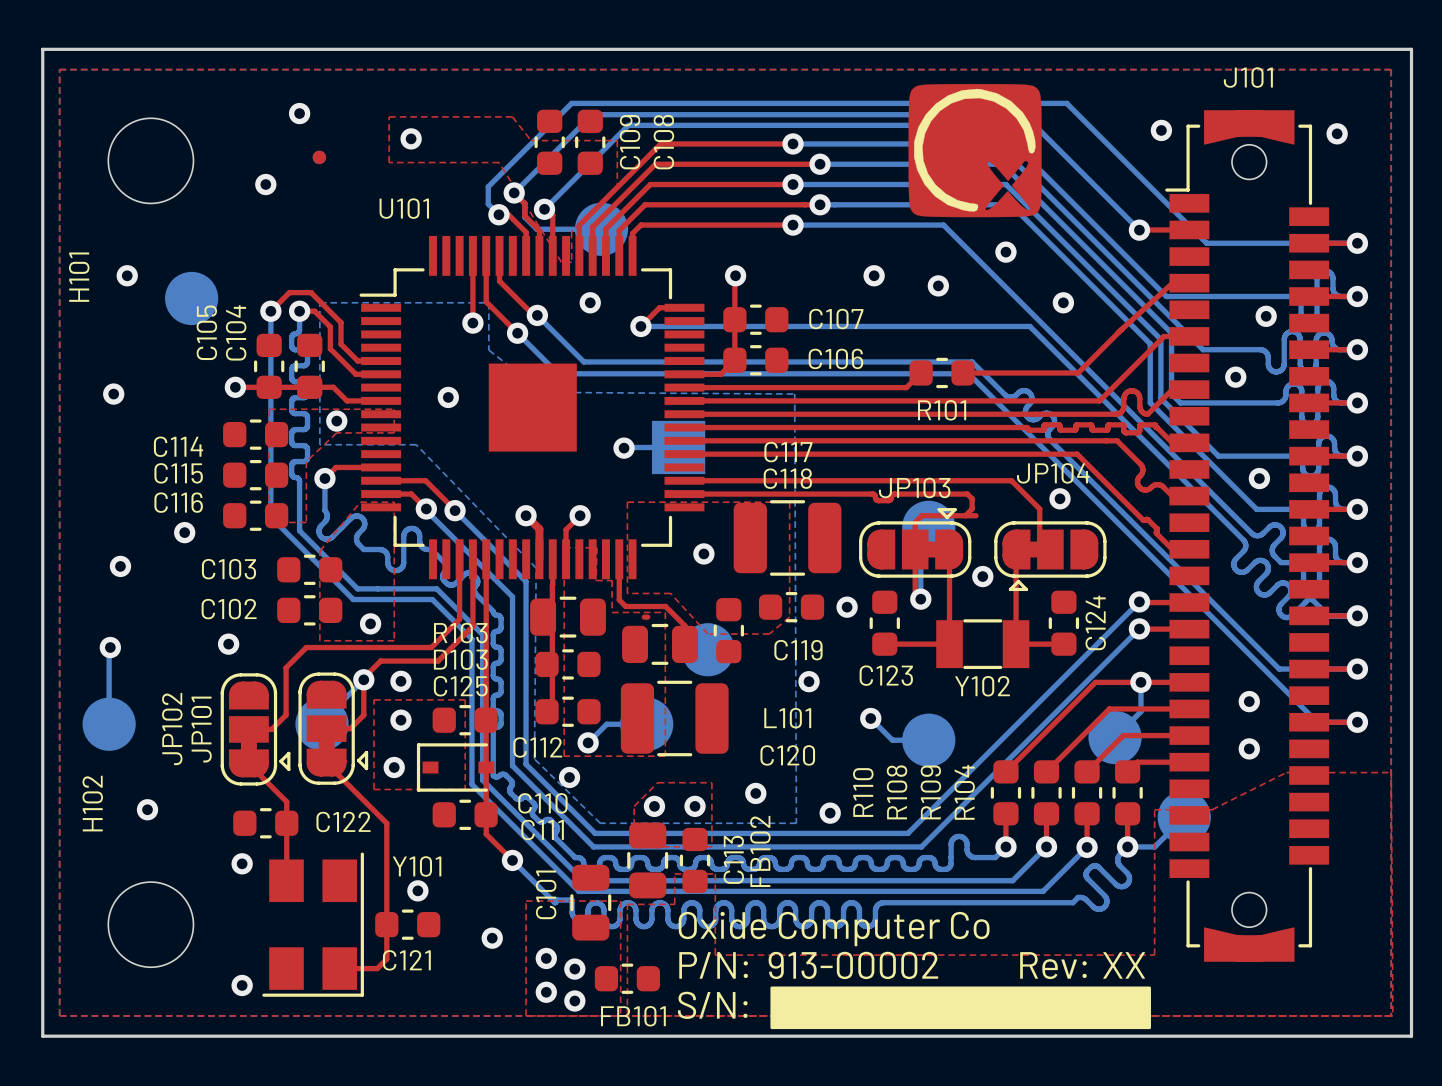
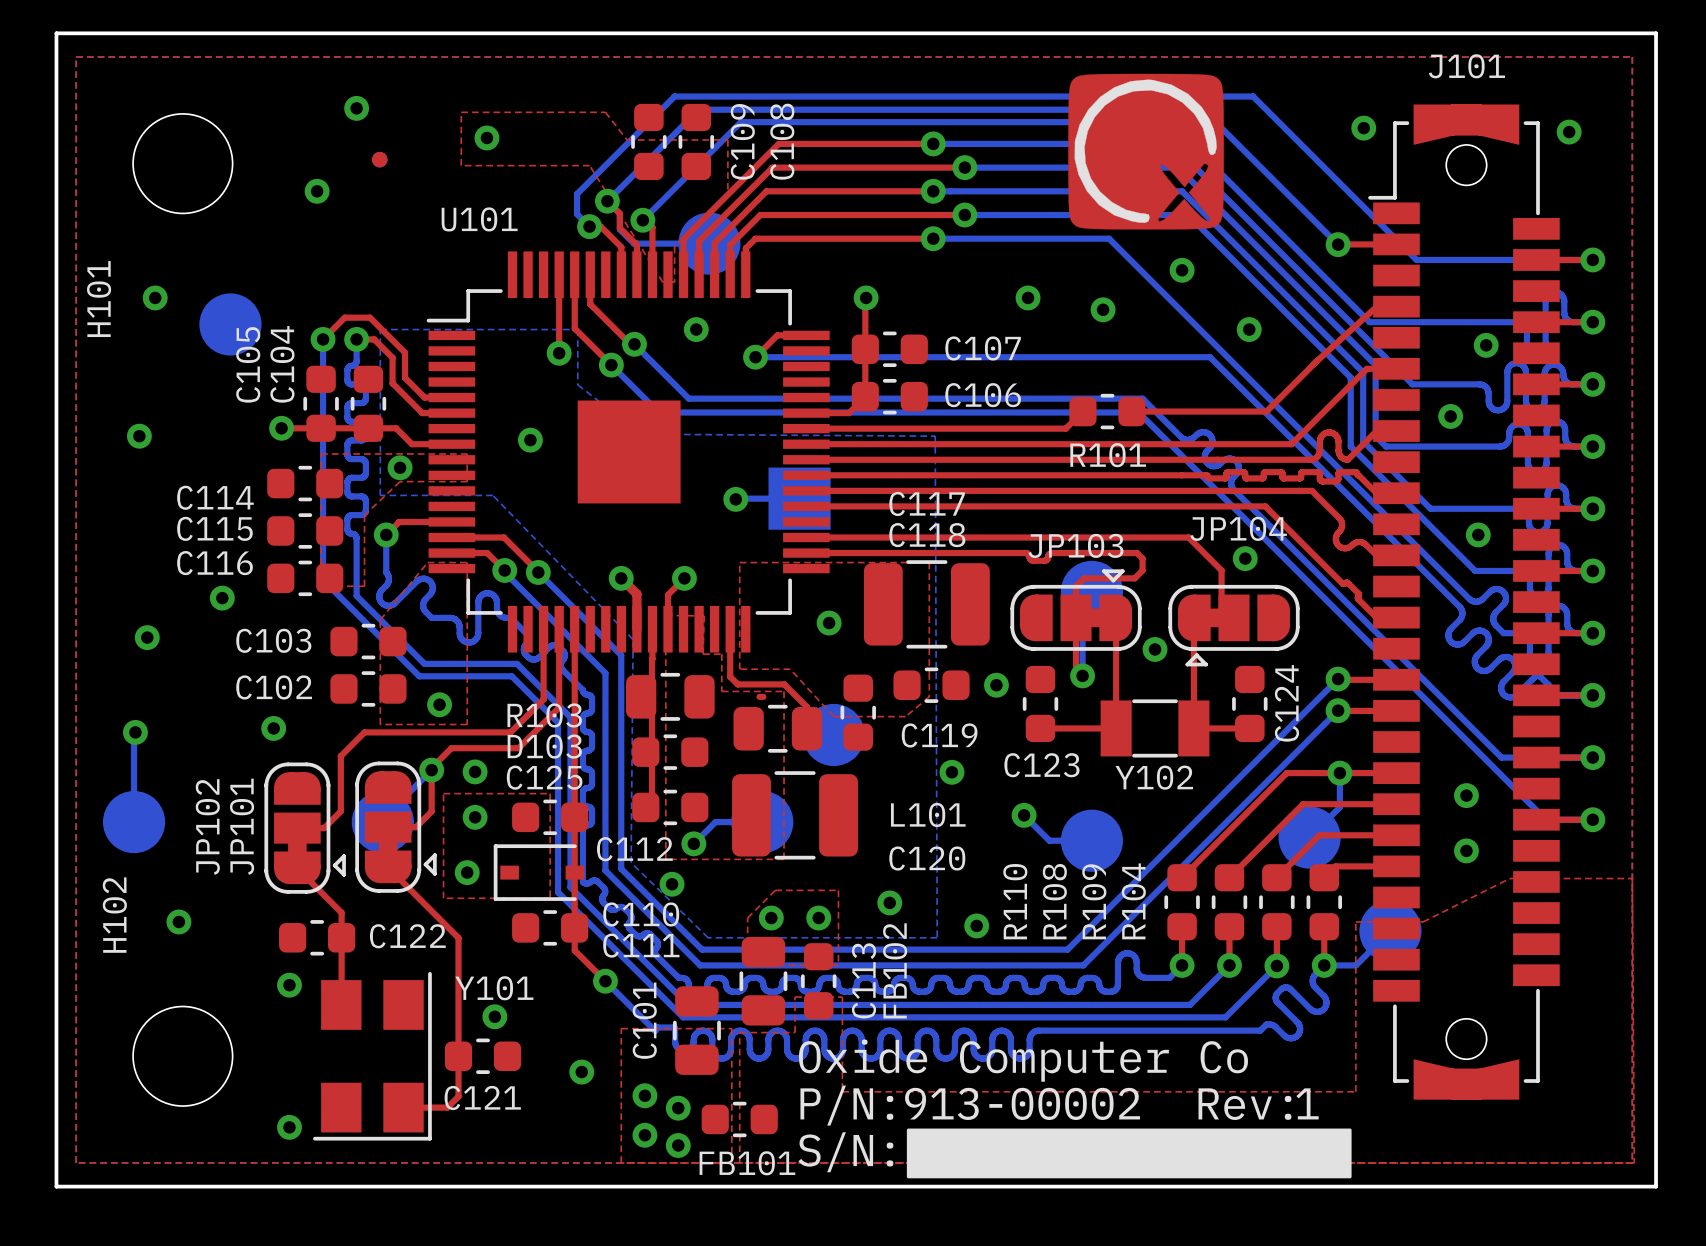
top track: (965, 515) (976, 515) -> none
drawing shape: [677, 911, 1151, 1030] -> [798, 1039, 1352, 1179]

